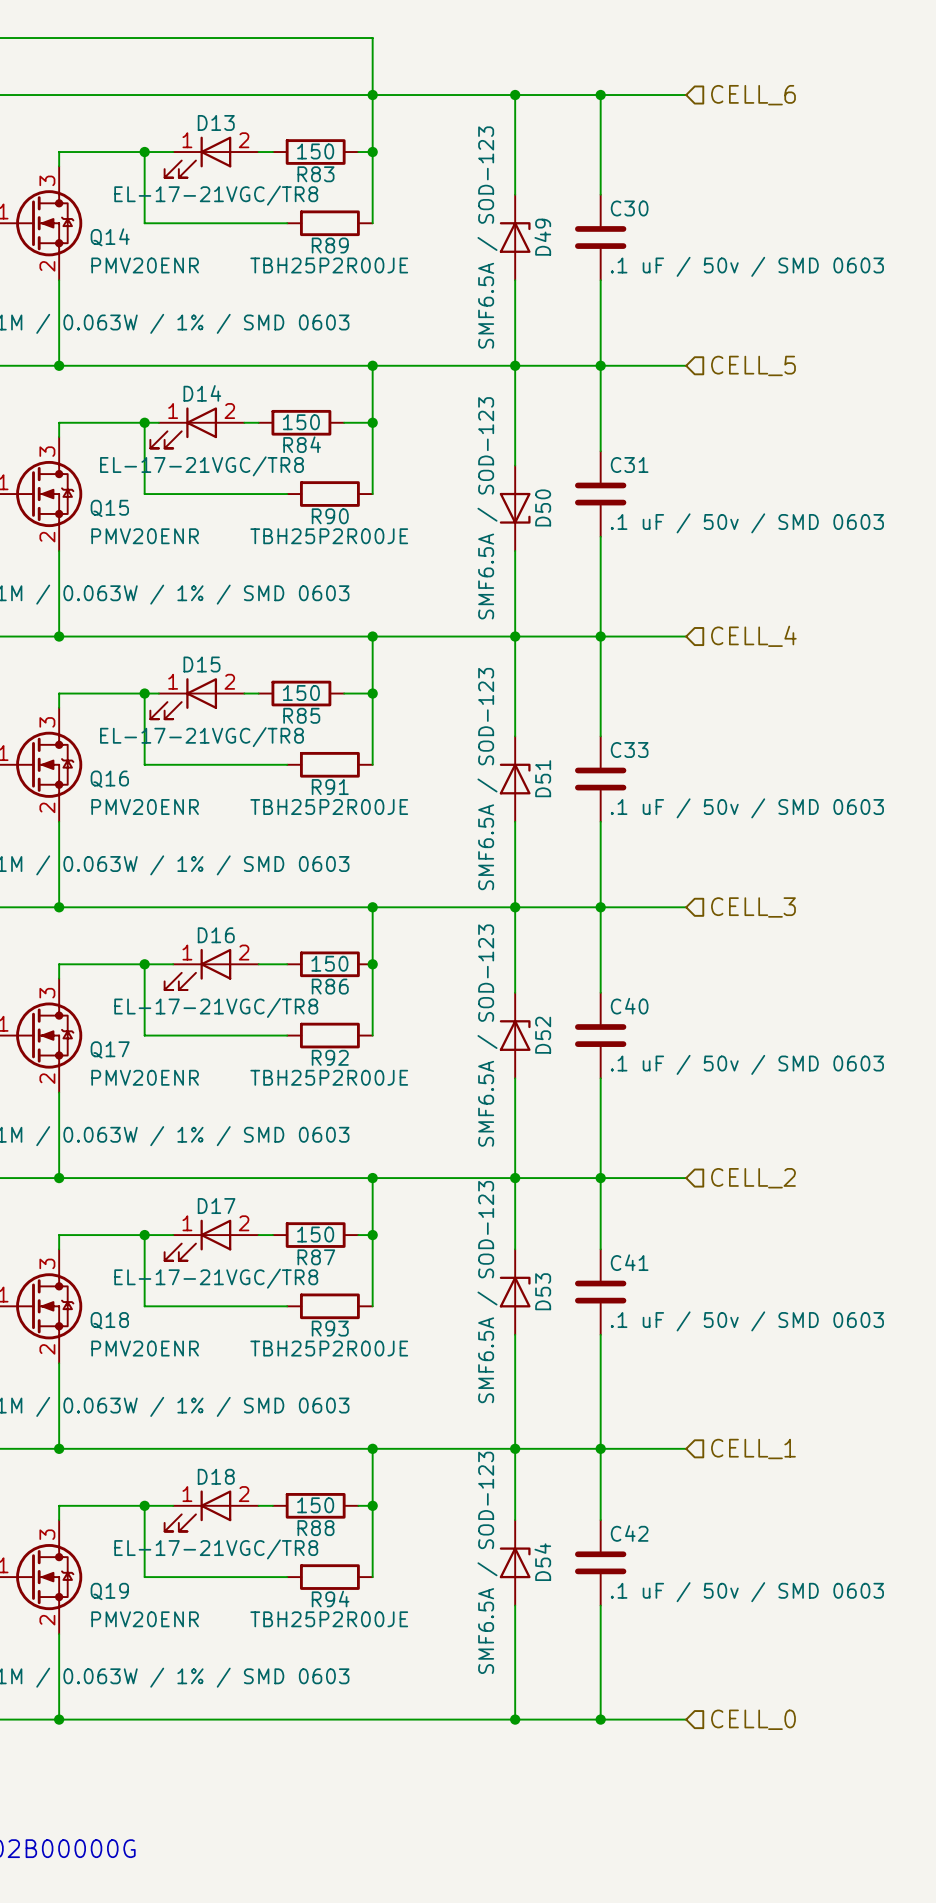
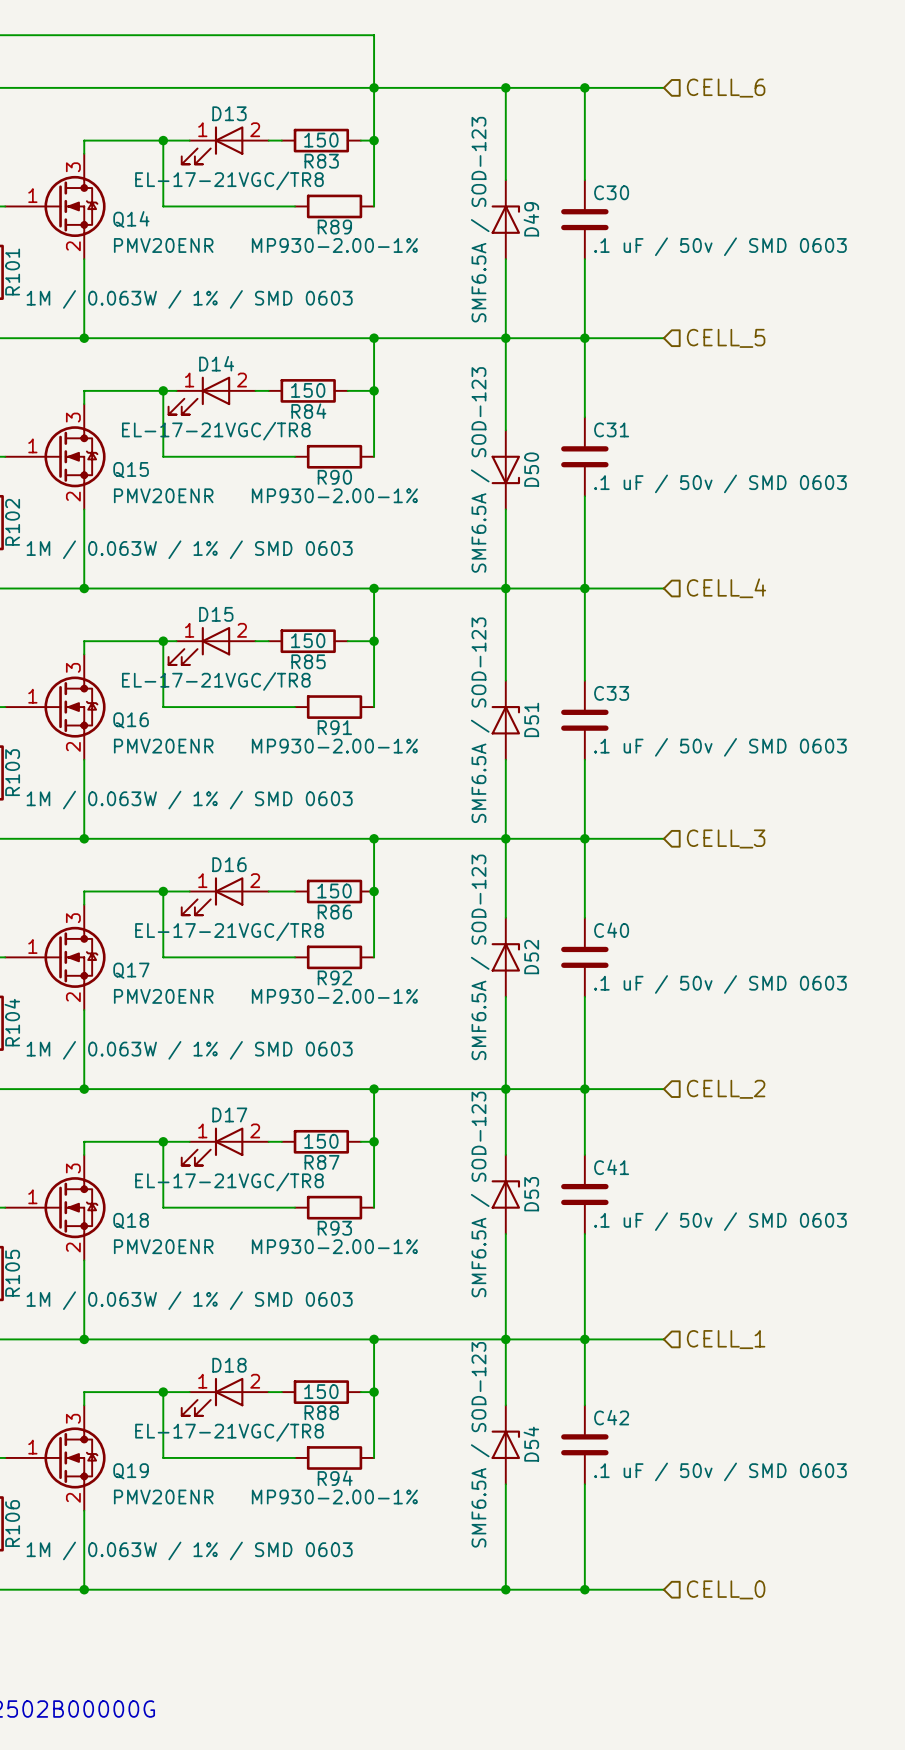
R89 value: TBH25P2R00JE (329, 265) -> MP930-2.00-1% (334, 245)
R90 value: TBH25P2R00JE (329, 536) -> MP930-2.00-1% (334, 495)
R91 value: TBH25P2R00JE (329, 807) -> MP930-2.00-1% (334, 746)
R92 value: TBH25P2R00JE (329, 1077) -> MP930-2.00-1% (334, 996)
R93 value: TBH25P2R00JE (329, 1348) -> MP930-2.00-1% (334, 1246)
R94 value: TBH25P2R00JE (329, 1619) -> MP930-2.00-1% (334, 1497)

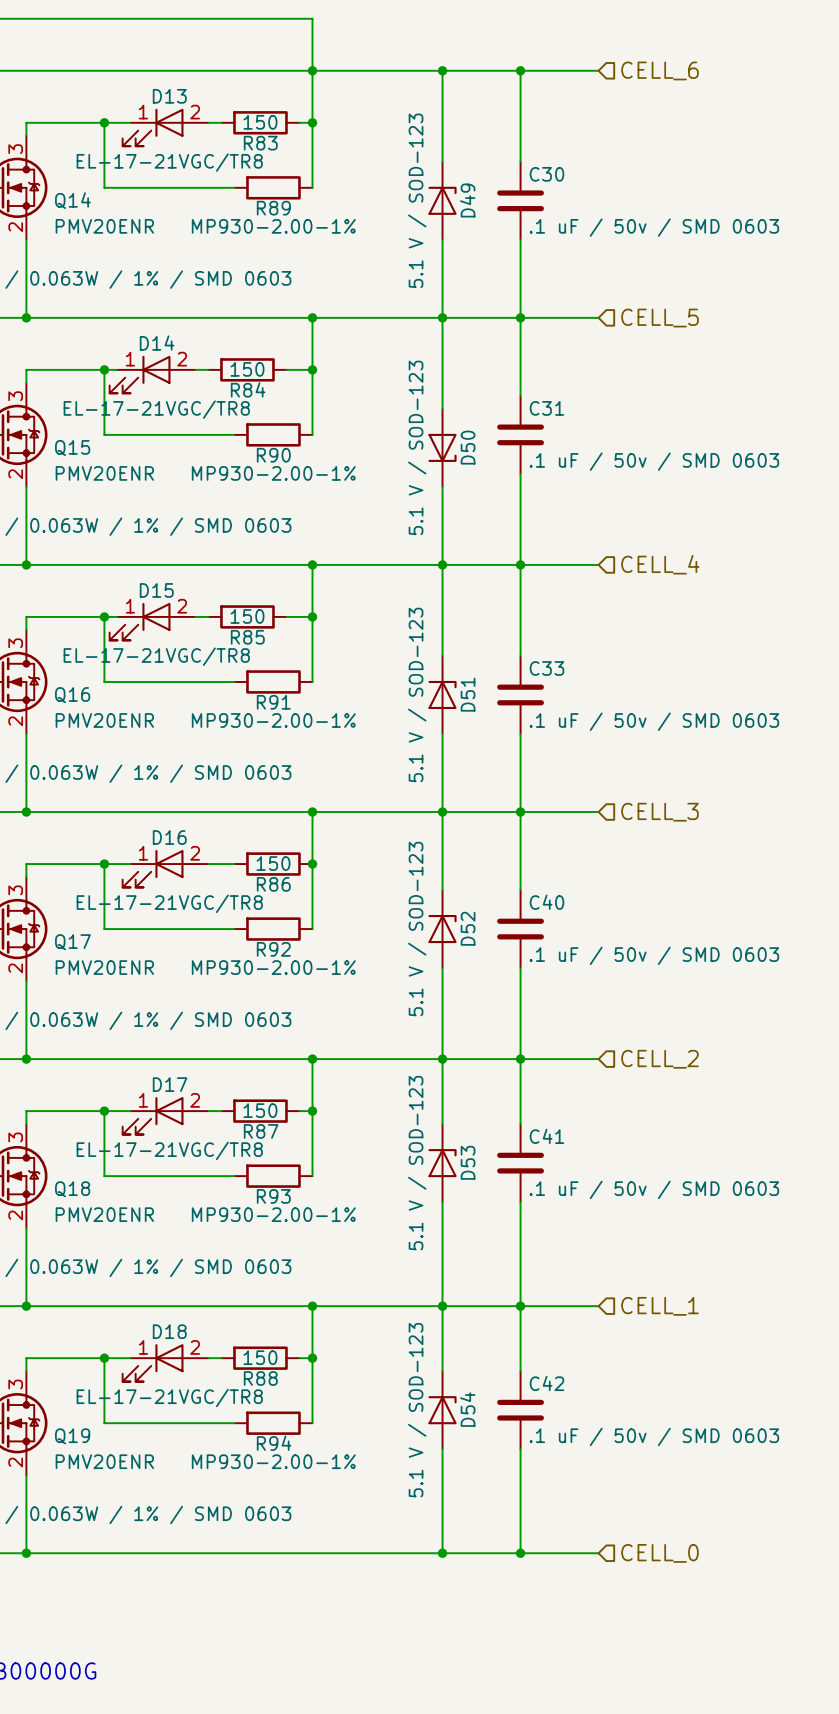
D49 value: SMF6.5A / SOD-123 (480, 219) -> 5.1 V / SOD-123 (417, 200)
D50 value: SMF6.5A / SOD-123 (480, 469) -> 5.1 V / SOD-123 (417, 447)
D51 value: SMF6.5A / SOD-123 (480, 720) -> 5.1 V / SOD-123 (417, 694)
D52 value: SMF6.5A / SOD-123 (480, 957) -> 5.1 V / SOD-123 (417, 929)
D53 value: SMF6.5A / SOD-123 (480, 1194) -> 5.1 V / SOD-123 (417, 1163)
D54 value: SMF6.5A / SOD-123 (480, 1444) -> 5.1 V / SOD-123 (417, 1410)

